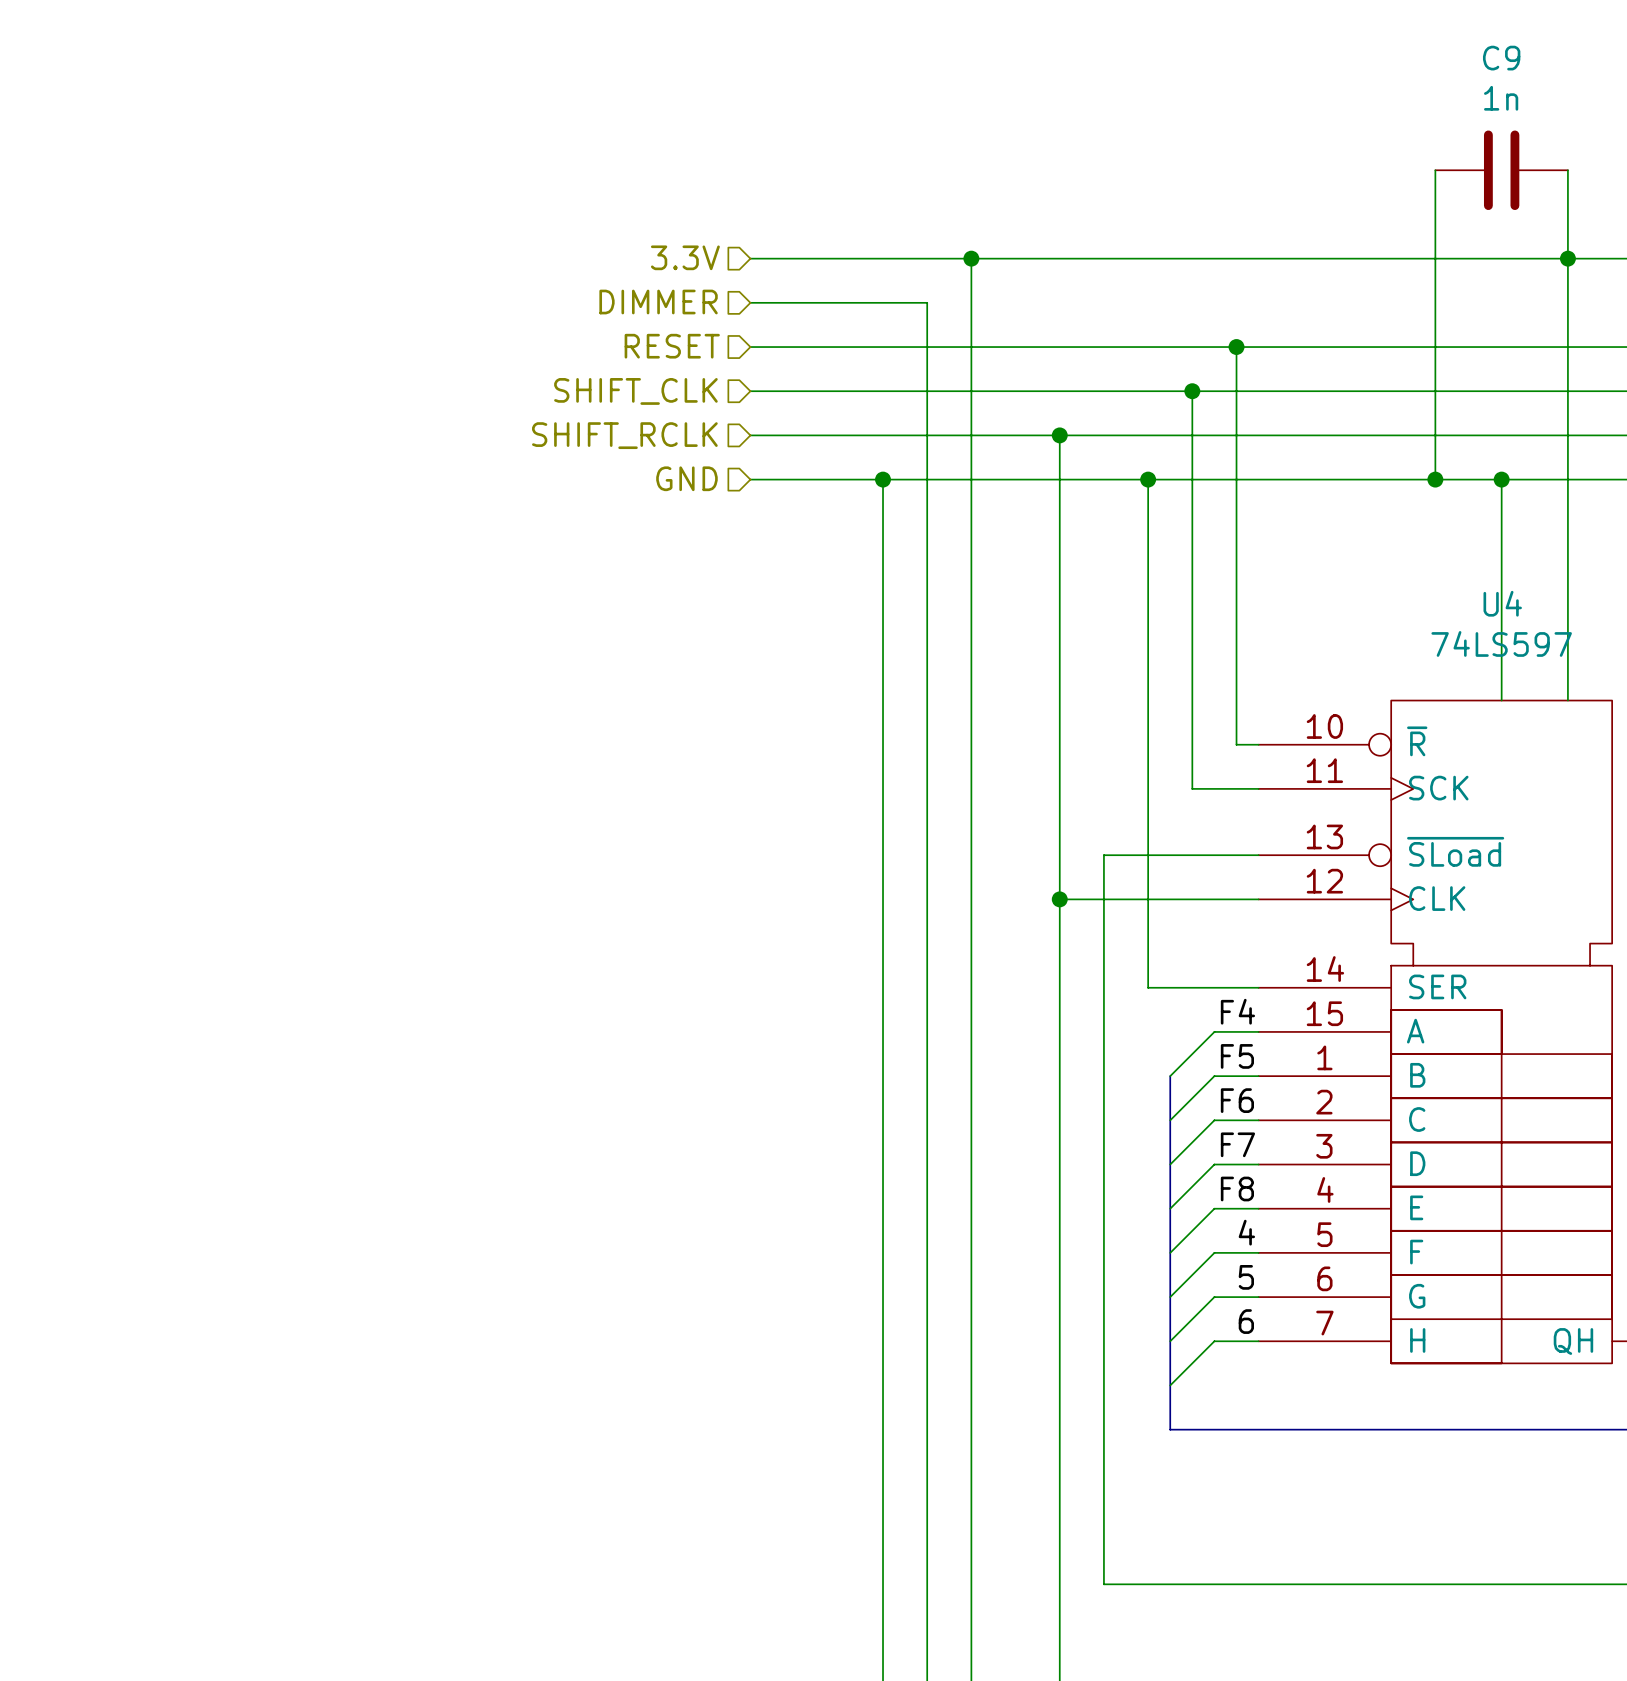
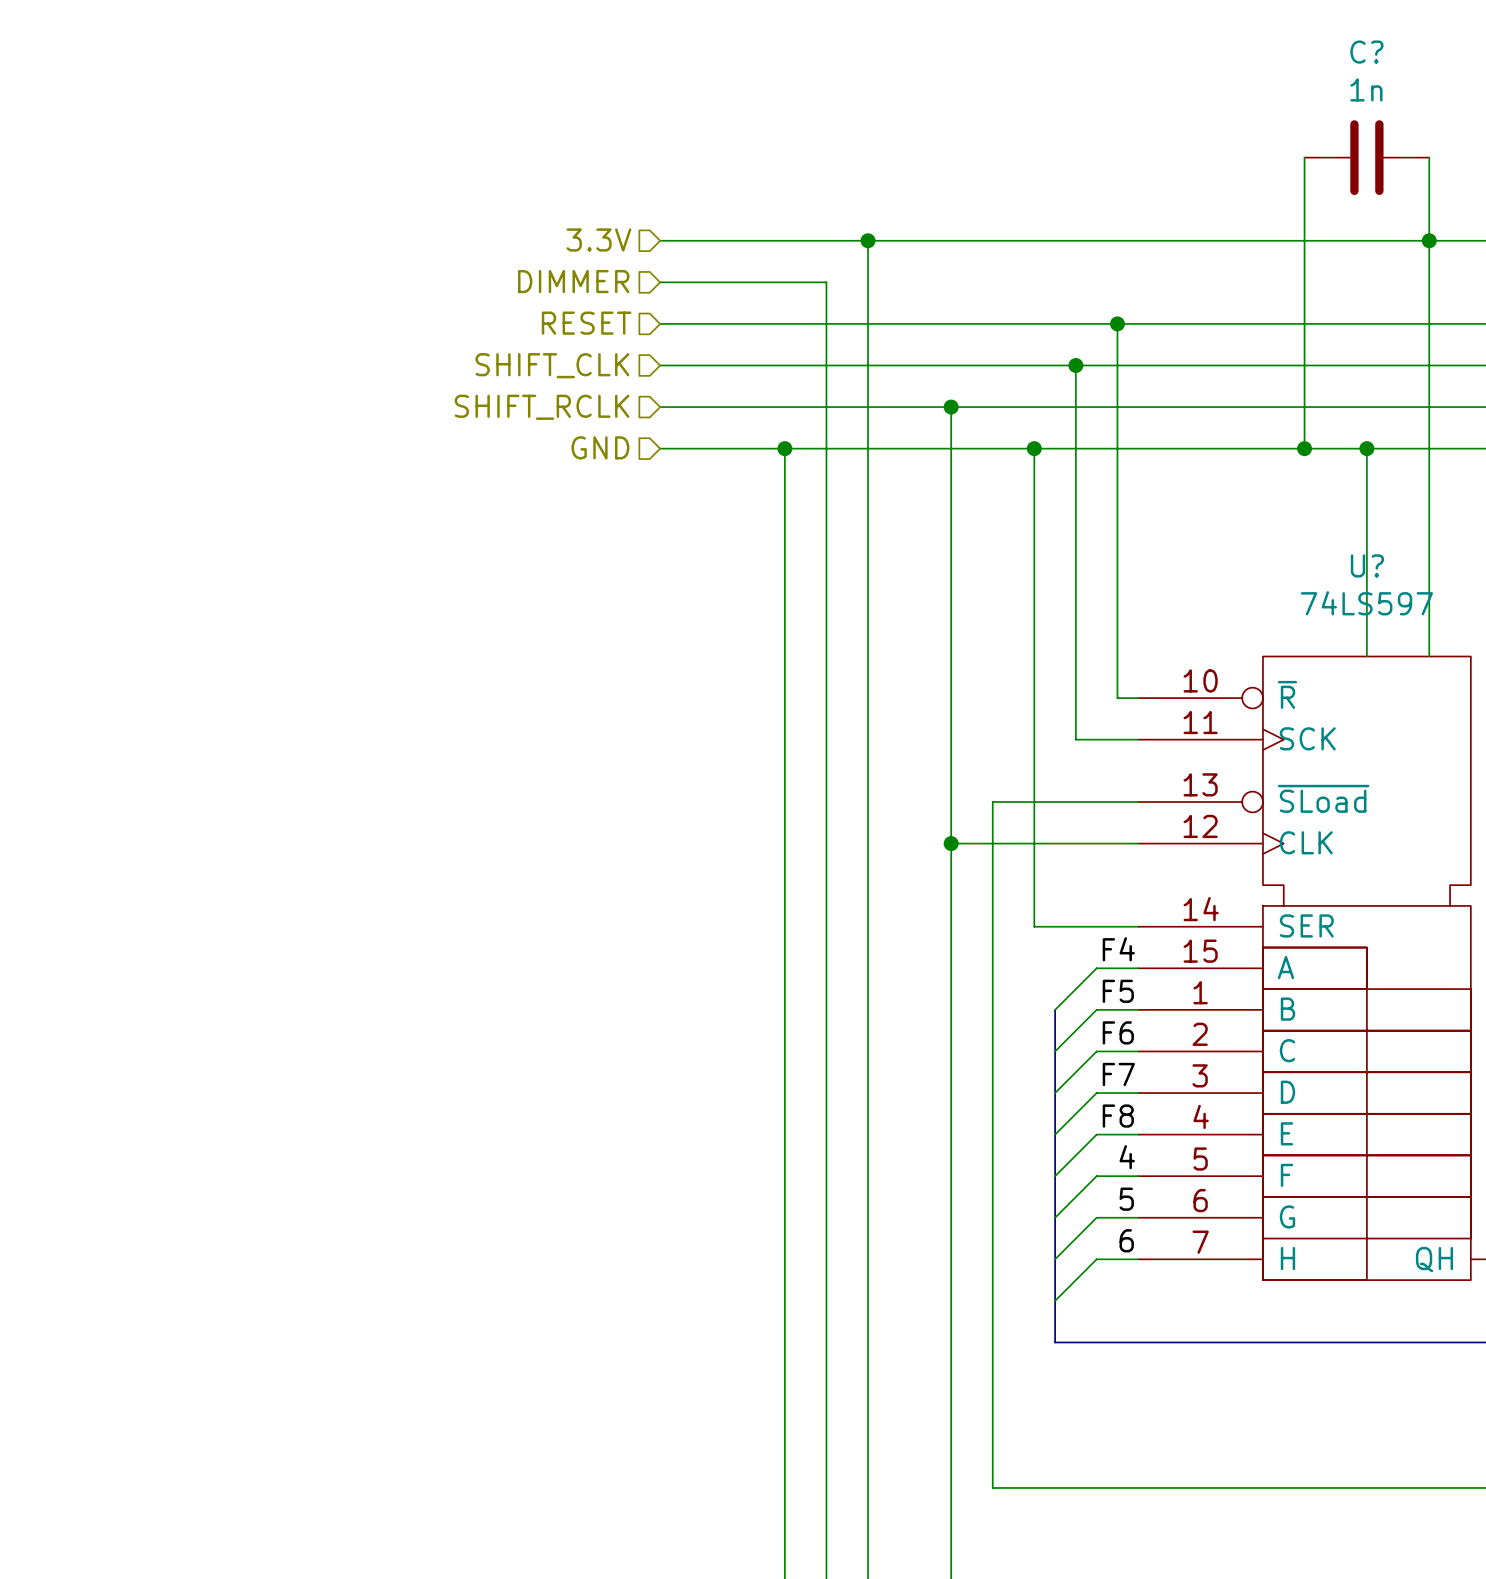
C9 name: C9 (1501, 58) -> C? (1366, 52)
U4 name: U4 (1502, 603) -> U? (1367, 565)

